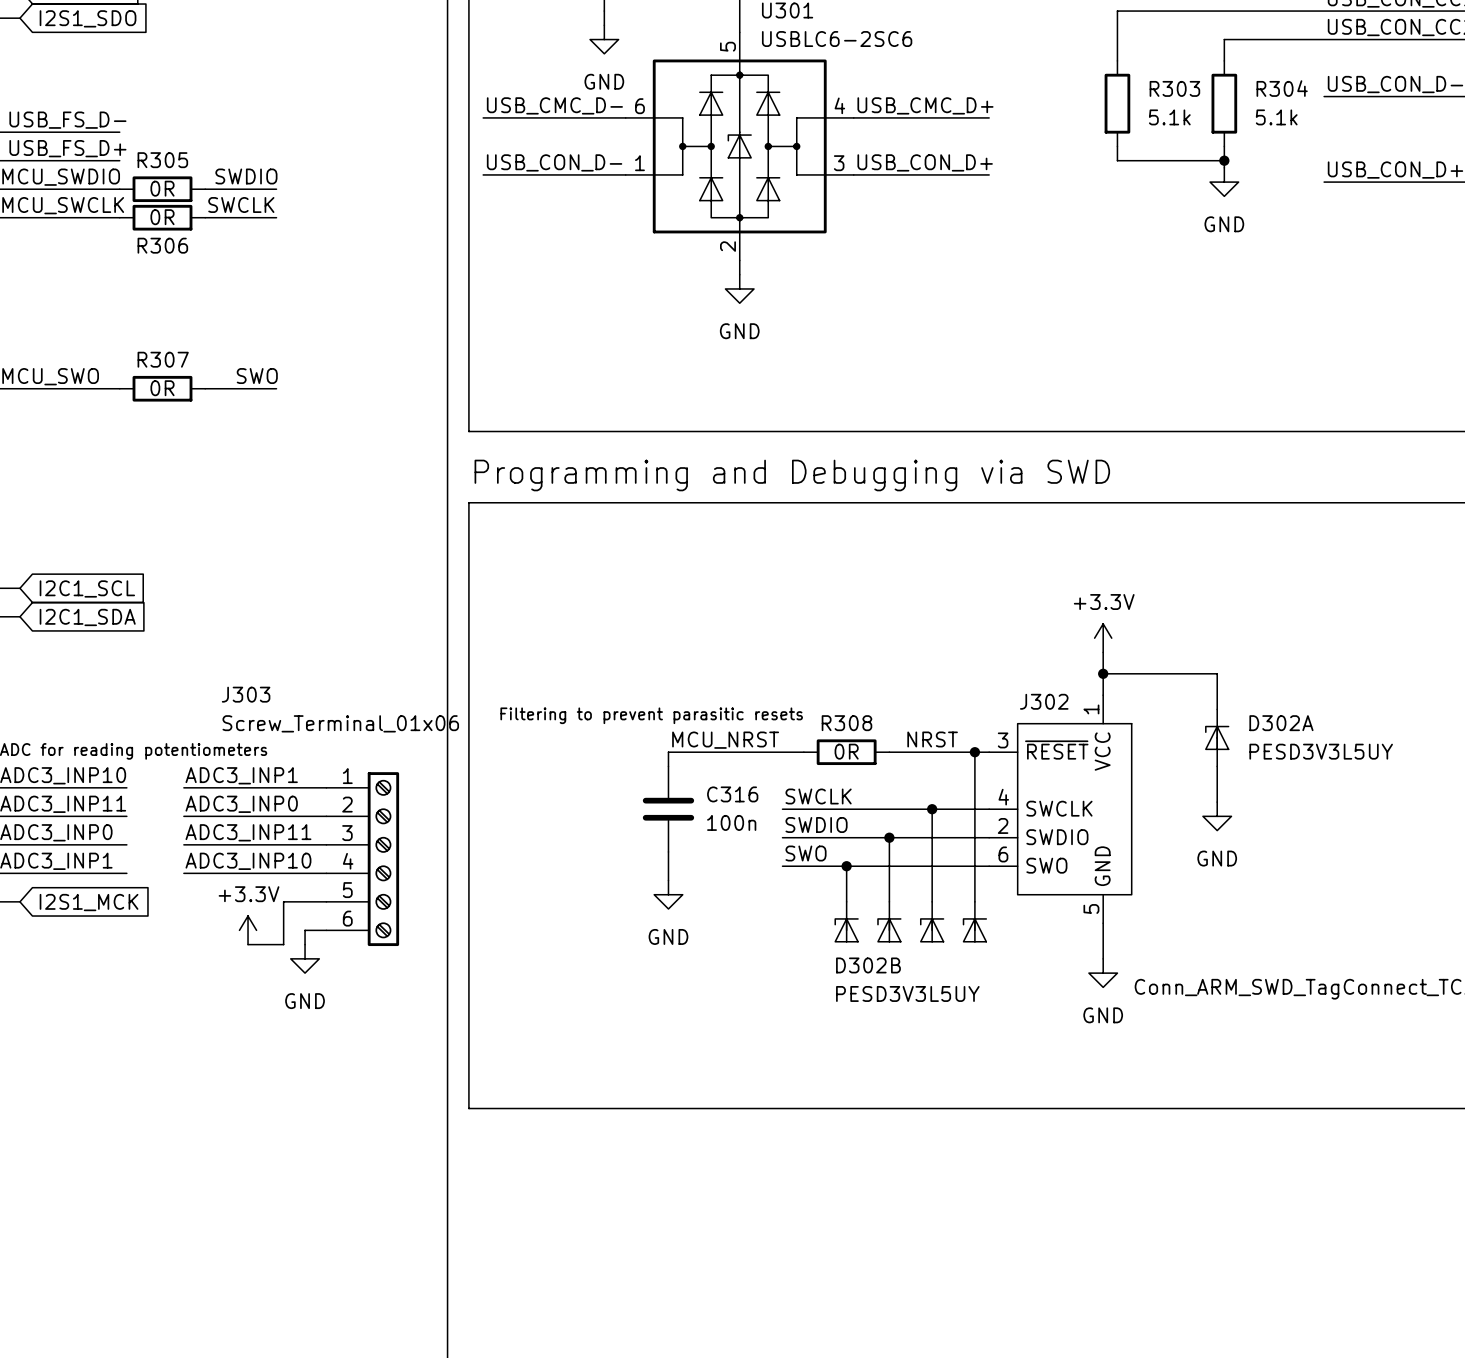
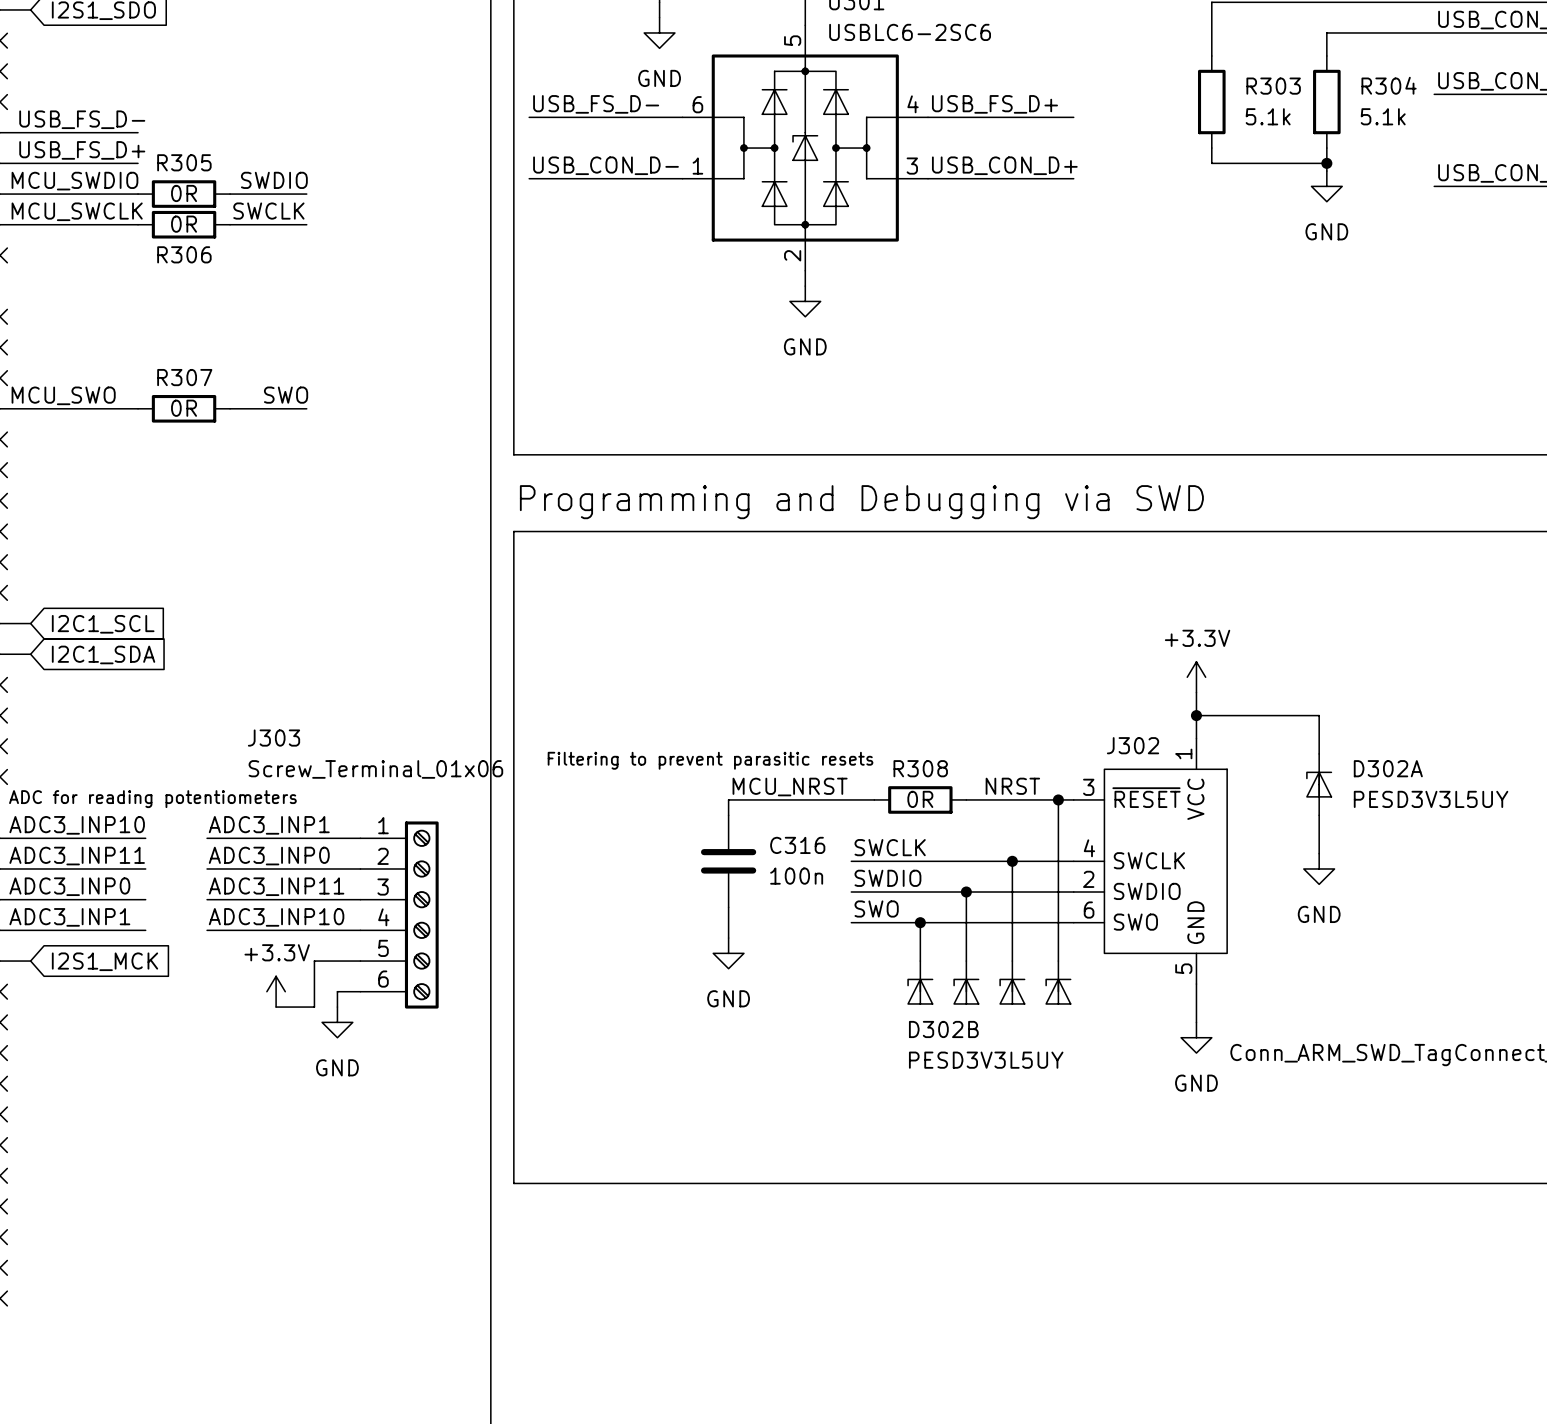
label: USB_CMC_D- (554, 105) -> USB_FS_D- (596, 104)
label: USB_CMC_D+ (925, 105) -> USB_FS_D+ (994, 104)

